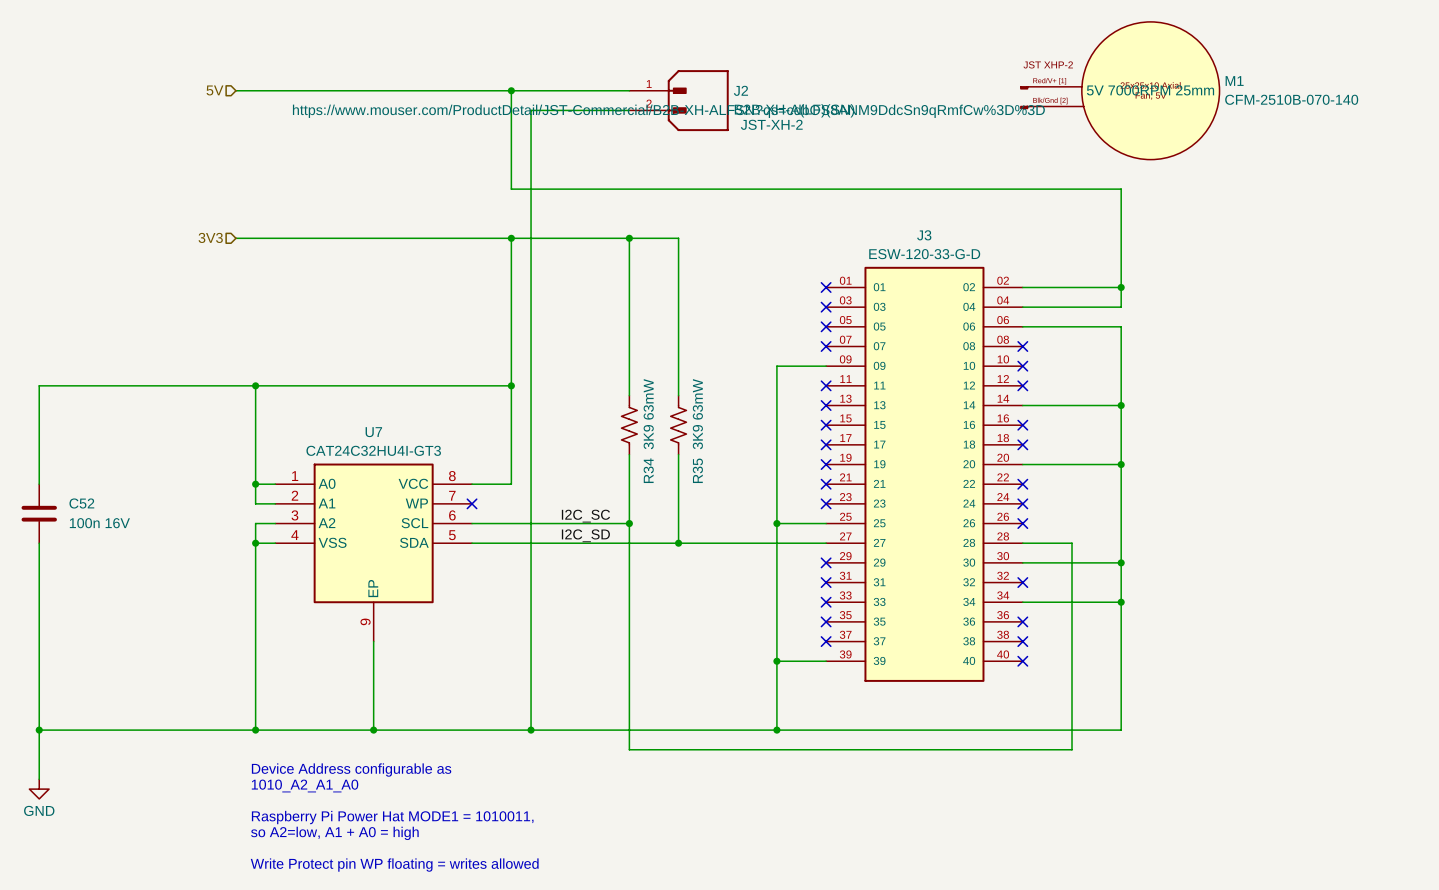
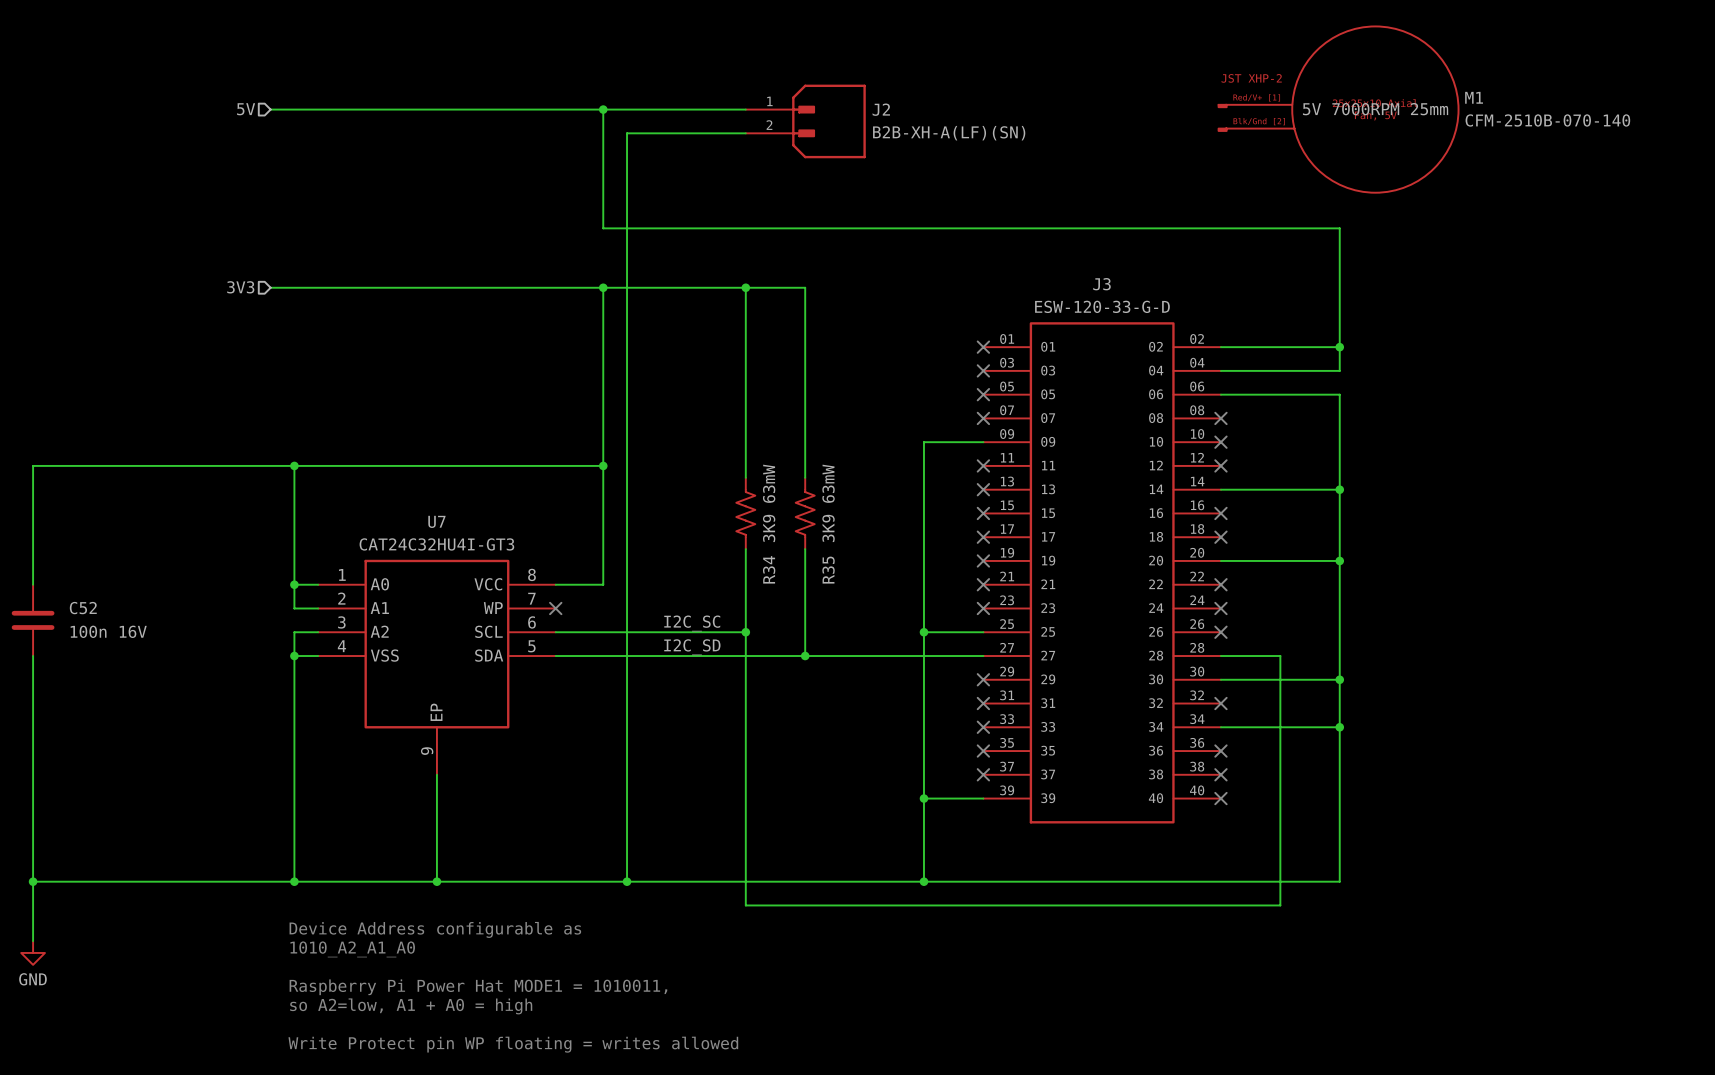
J2 text: https://www.mouser.com/ProductDetail/JST-Commercial/B2B-XH-ALFSN?qs=cdbOS8ANM9DdcSn9qRmfCw%3D%3D (668, 111) -> none
J2 text: JST-XH-2 (771, 124) -> none

